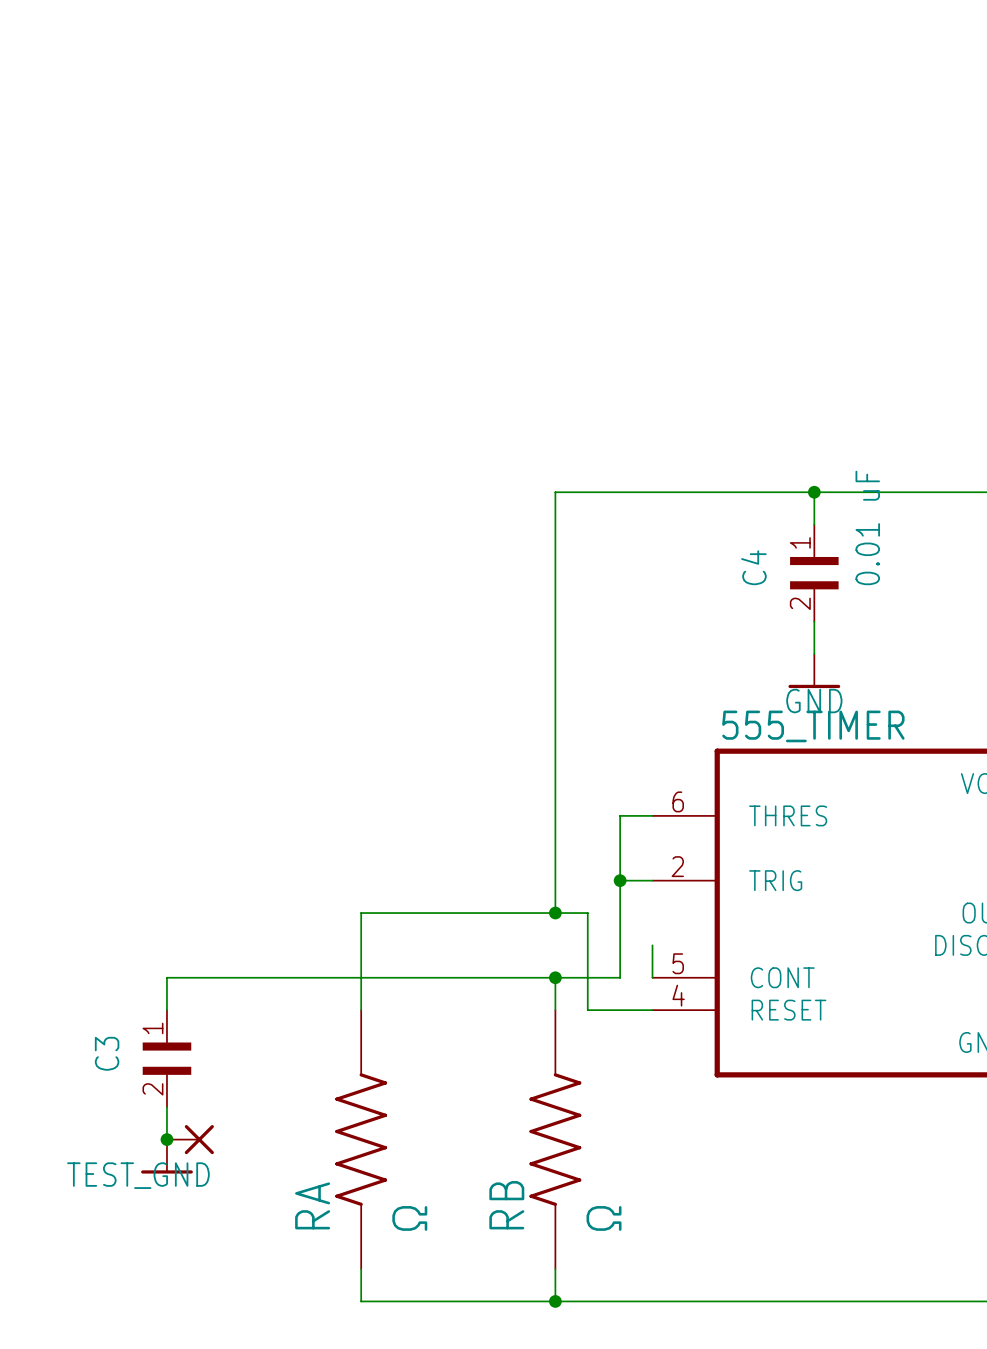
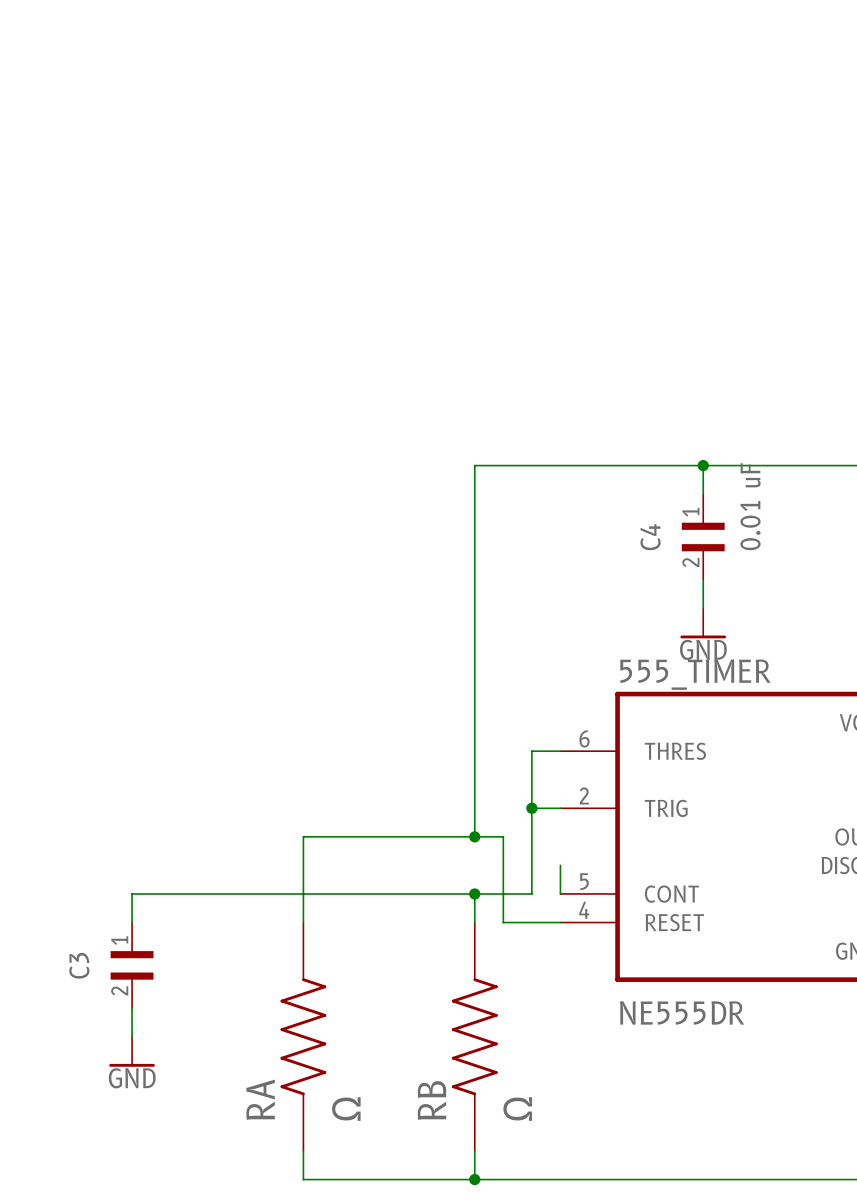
555_TIMER value: none -> NE555DR (682, 1012)
junction: (166, 1139) -> none
TEST_GND: (190, 1139) -> none
power symbol text: none -> GND (132, 1078)

